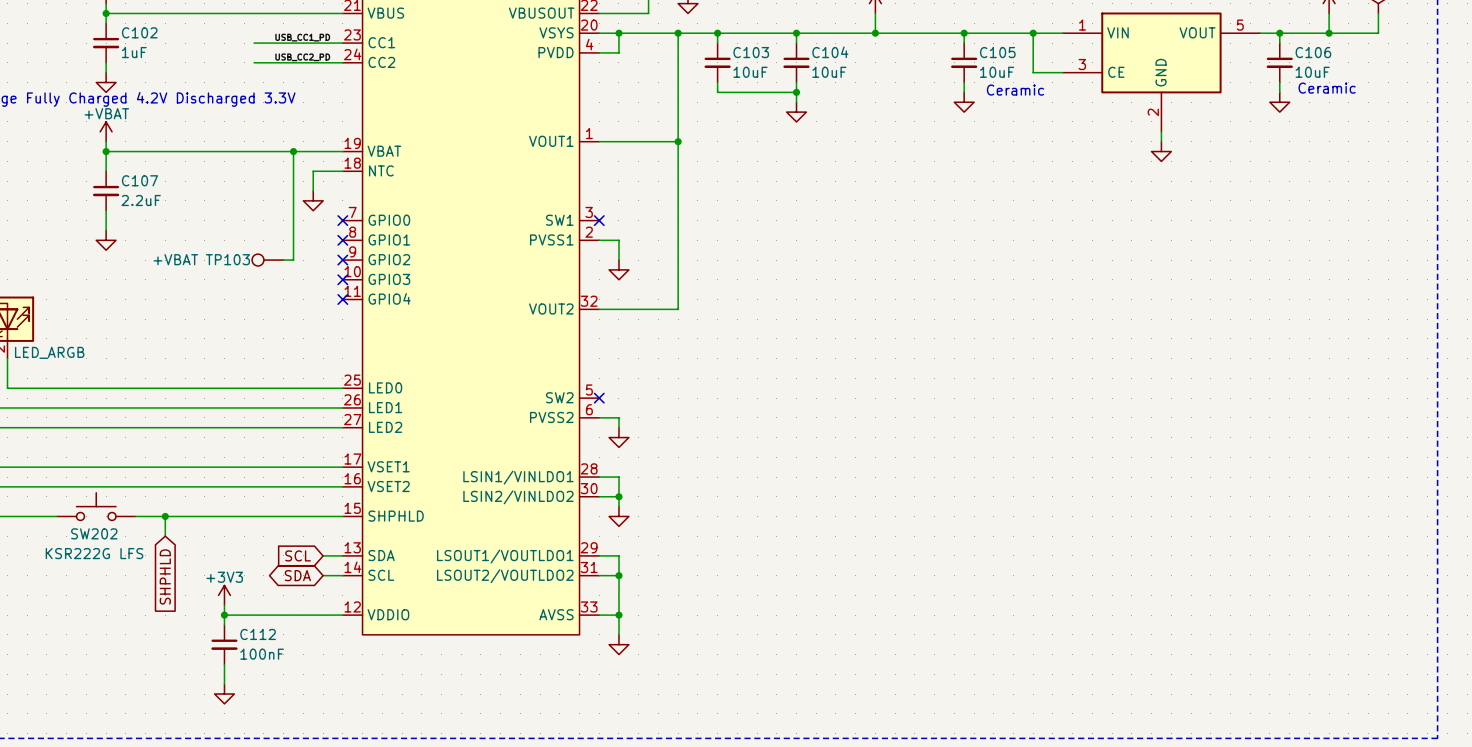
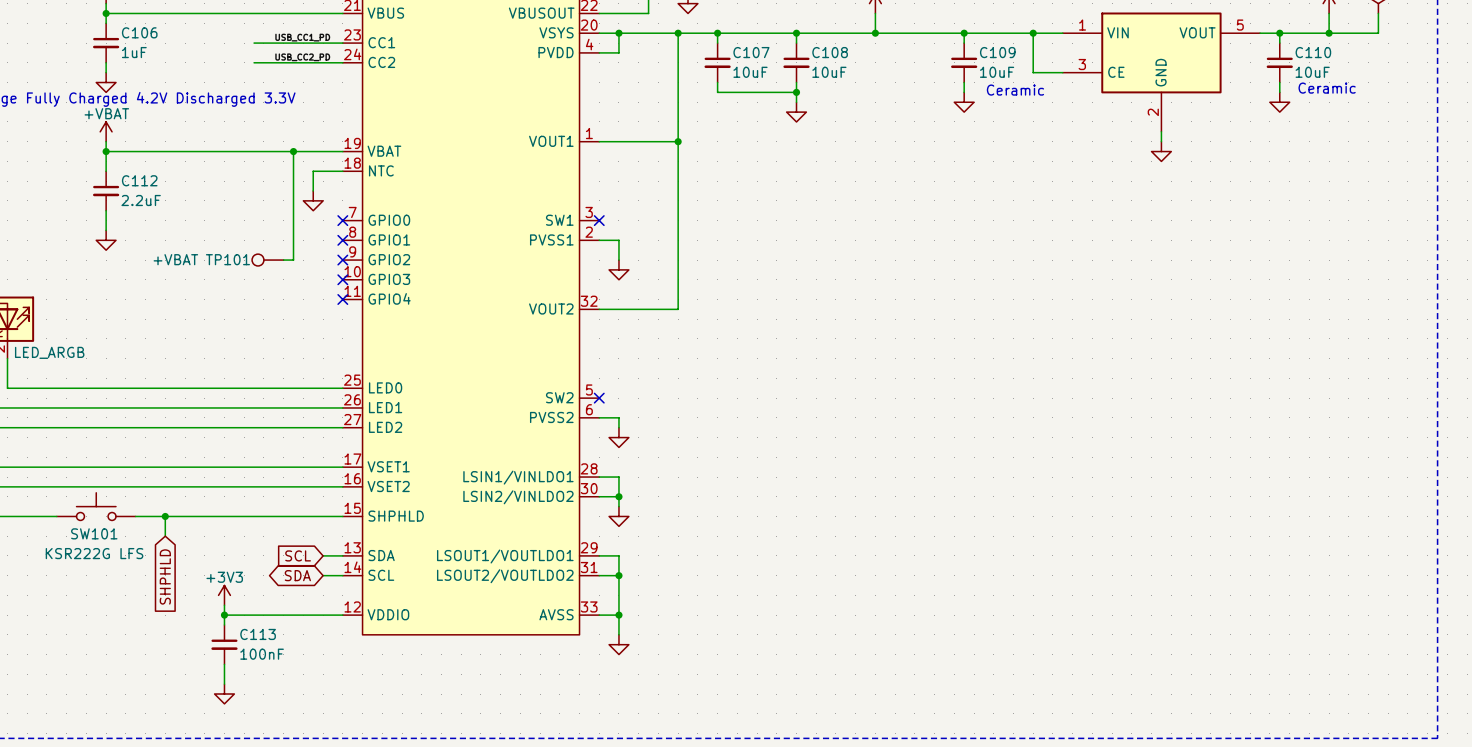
C102 name: C102 (139, 32) -> C106 (139, 32)
C103 name: C103 (751, 52) -> C107 (751, 52)
C104 name: C104 (830, 52) -> C108 (830, 52)
C105 name: C105 (997, 52) -> C109 (997, 52)
C106 name: C106 (1313, 52) -> C110 (1313, 52)
C107 name: C107 (139, 180) -> C112 (139, 180)
TP103 name: TP103 (227, 259) -> TP101 (227, 259)
SW202 name: SW202 (94, 533) -> SW101 (94, 533)
C112 name: C112 (258, 634) -> C113 (258, 634)

